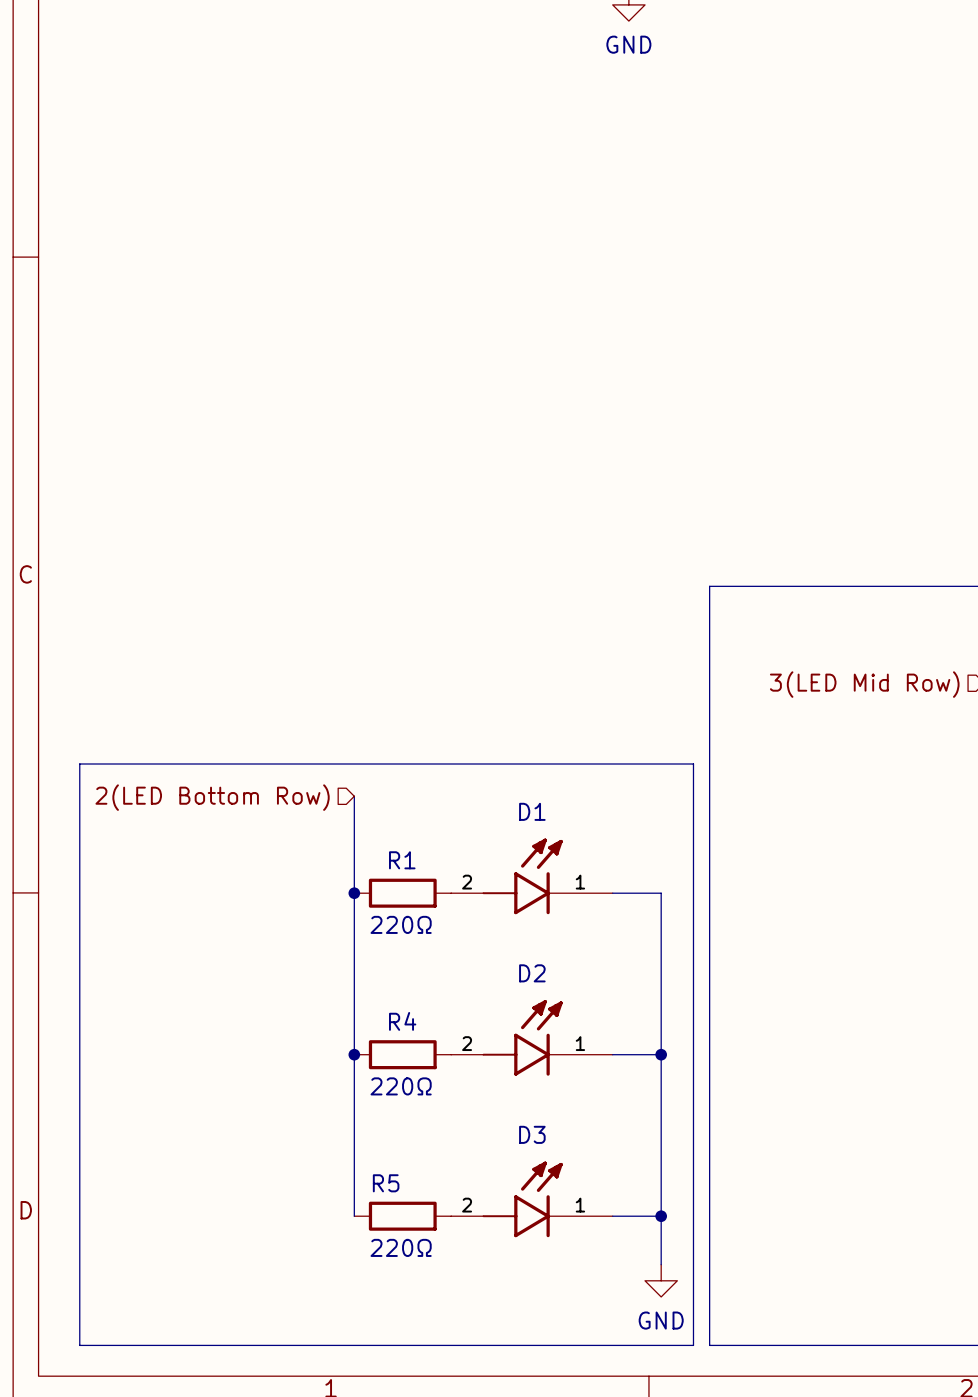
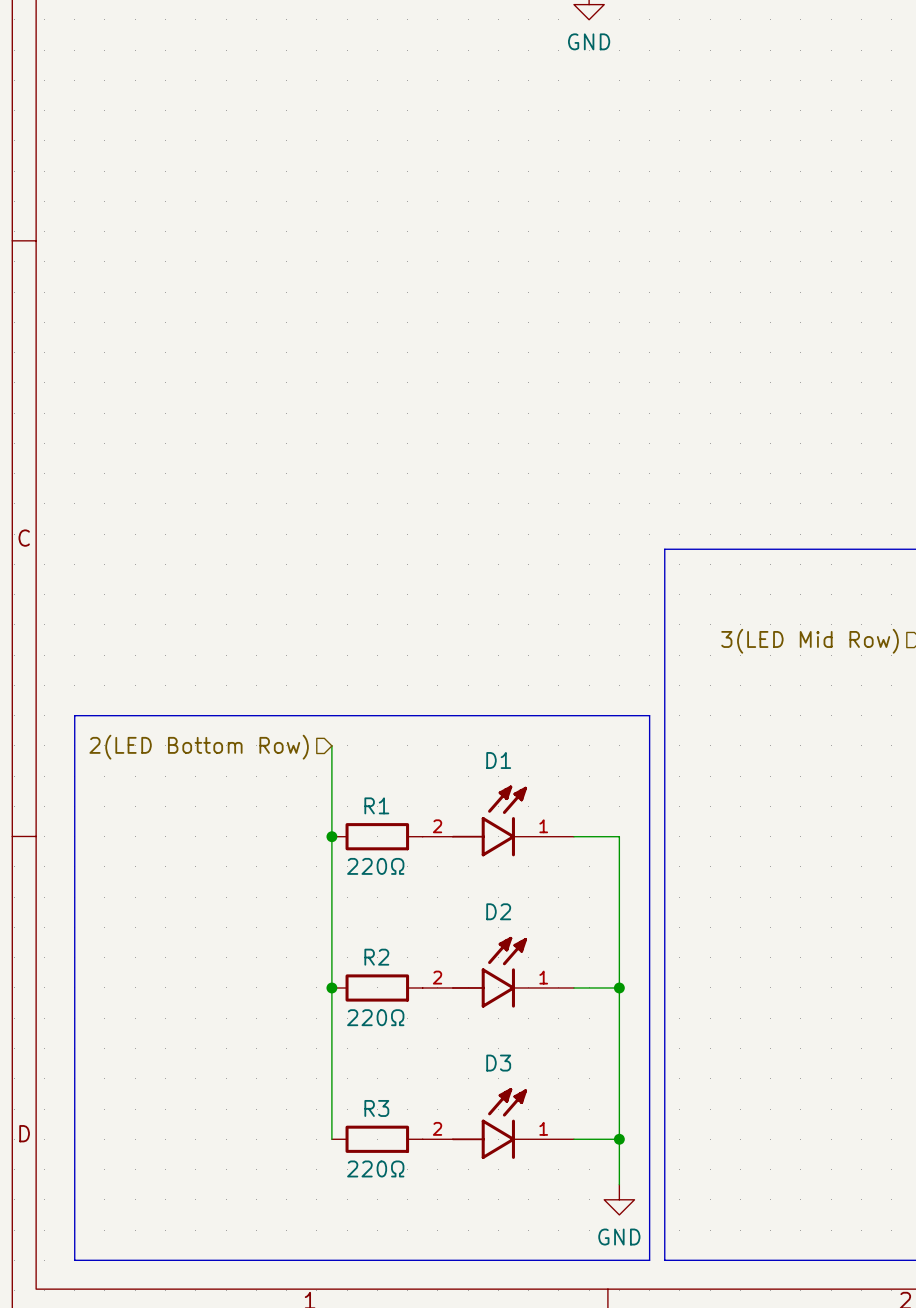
R4 name: R4 (402, 1021) -> R2 (376, 957)
R5 name: R5 (386, 1183) -> R3 (376, 1108)

